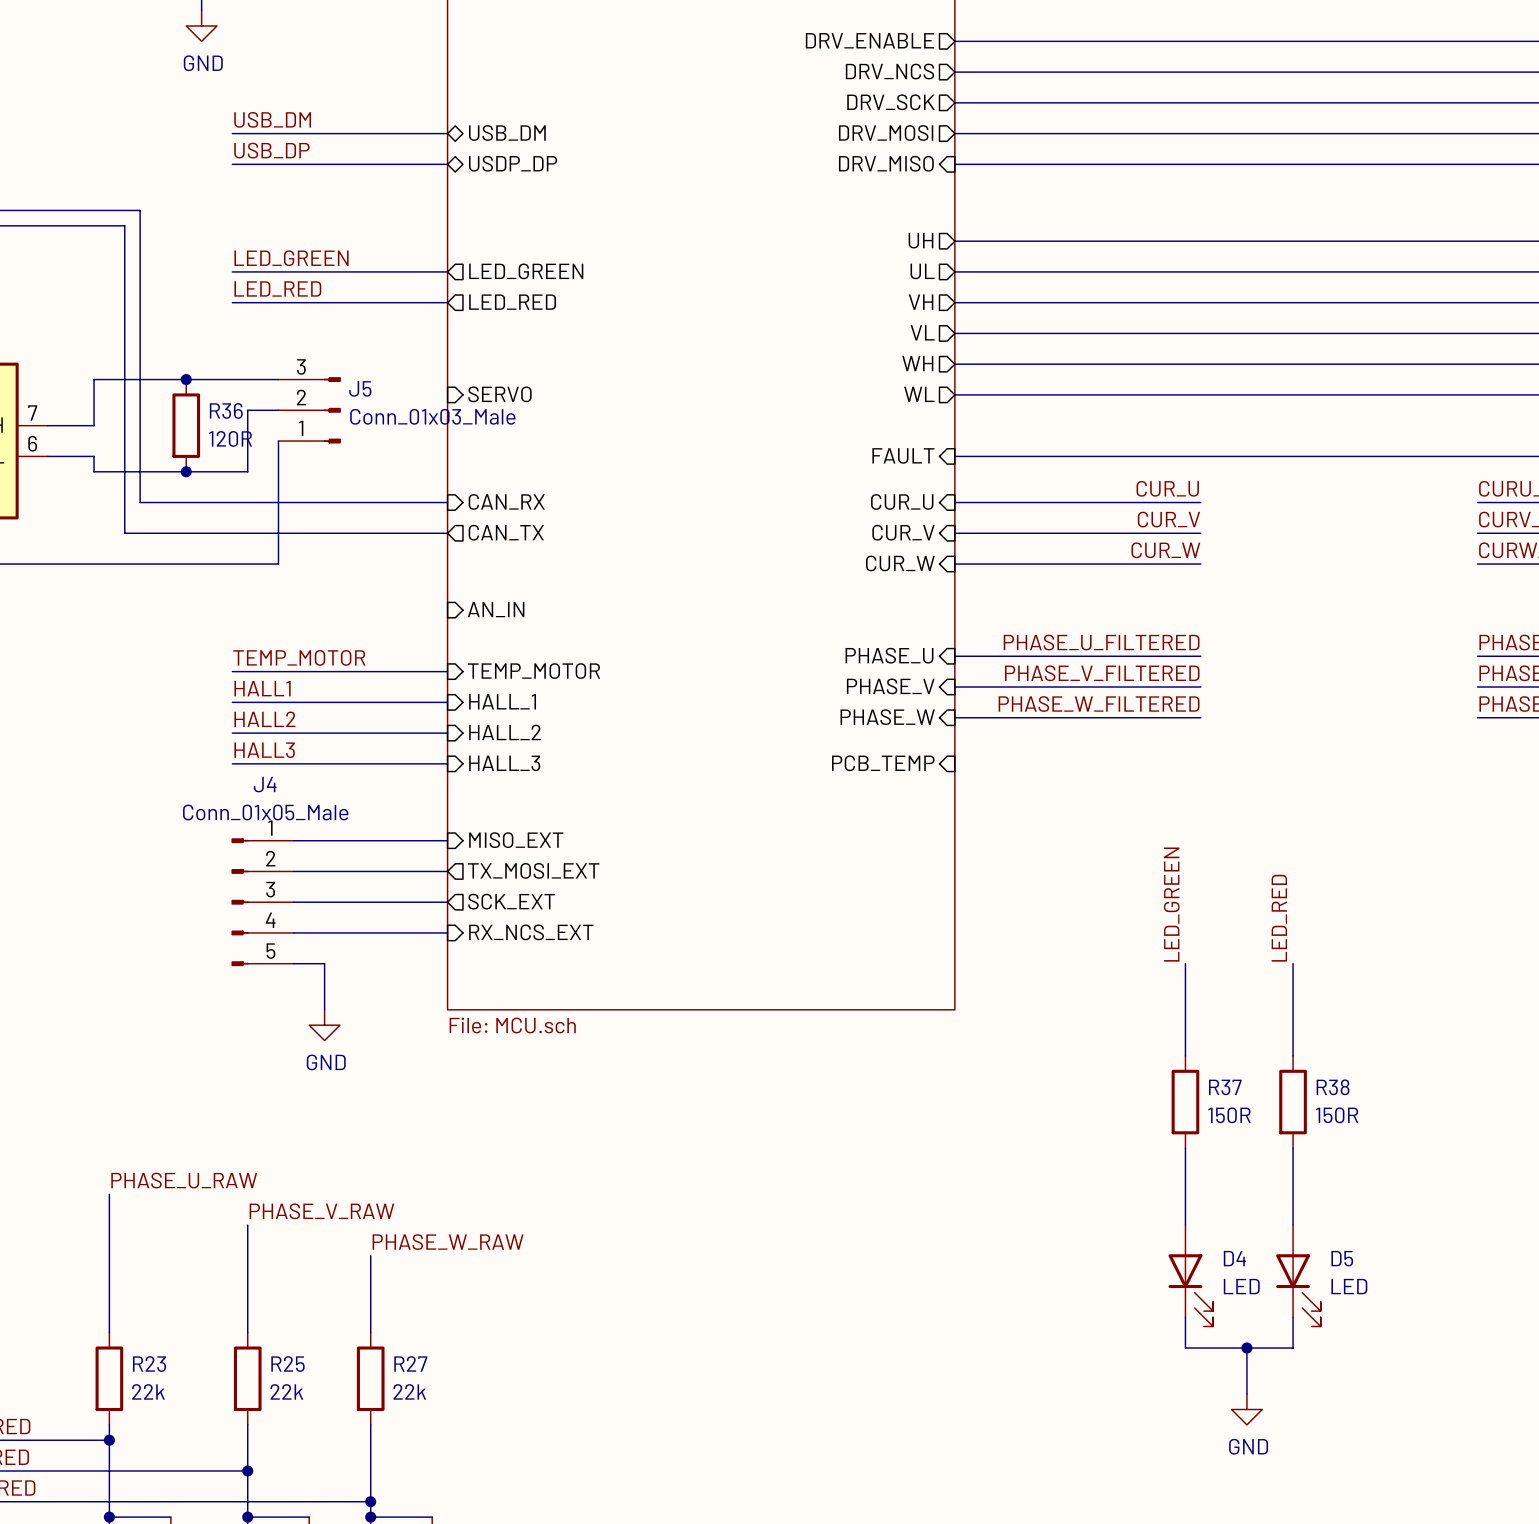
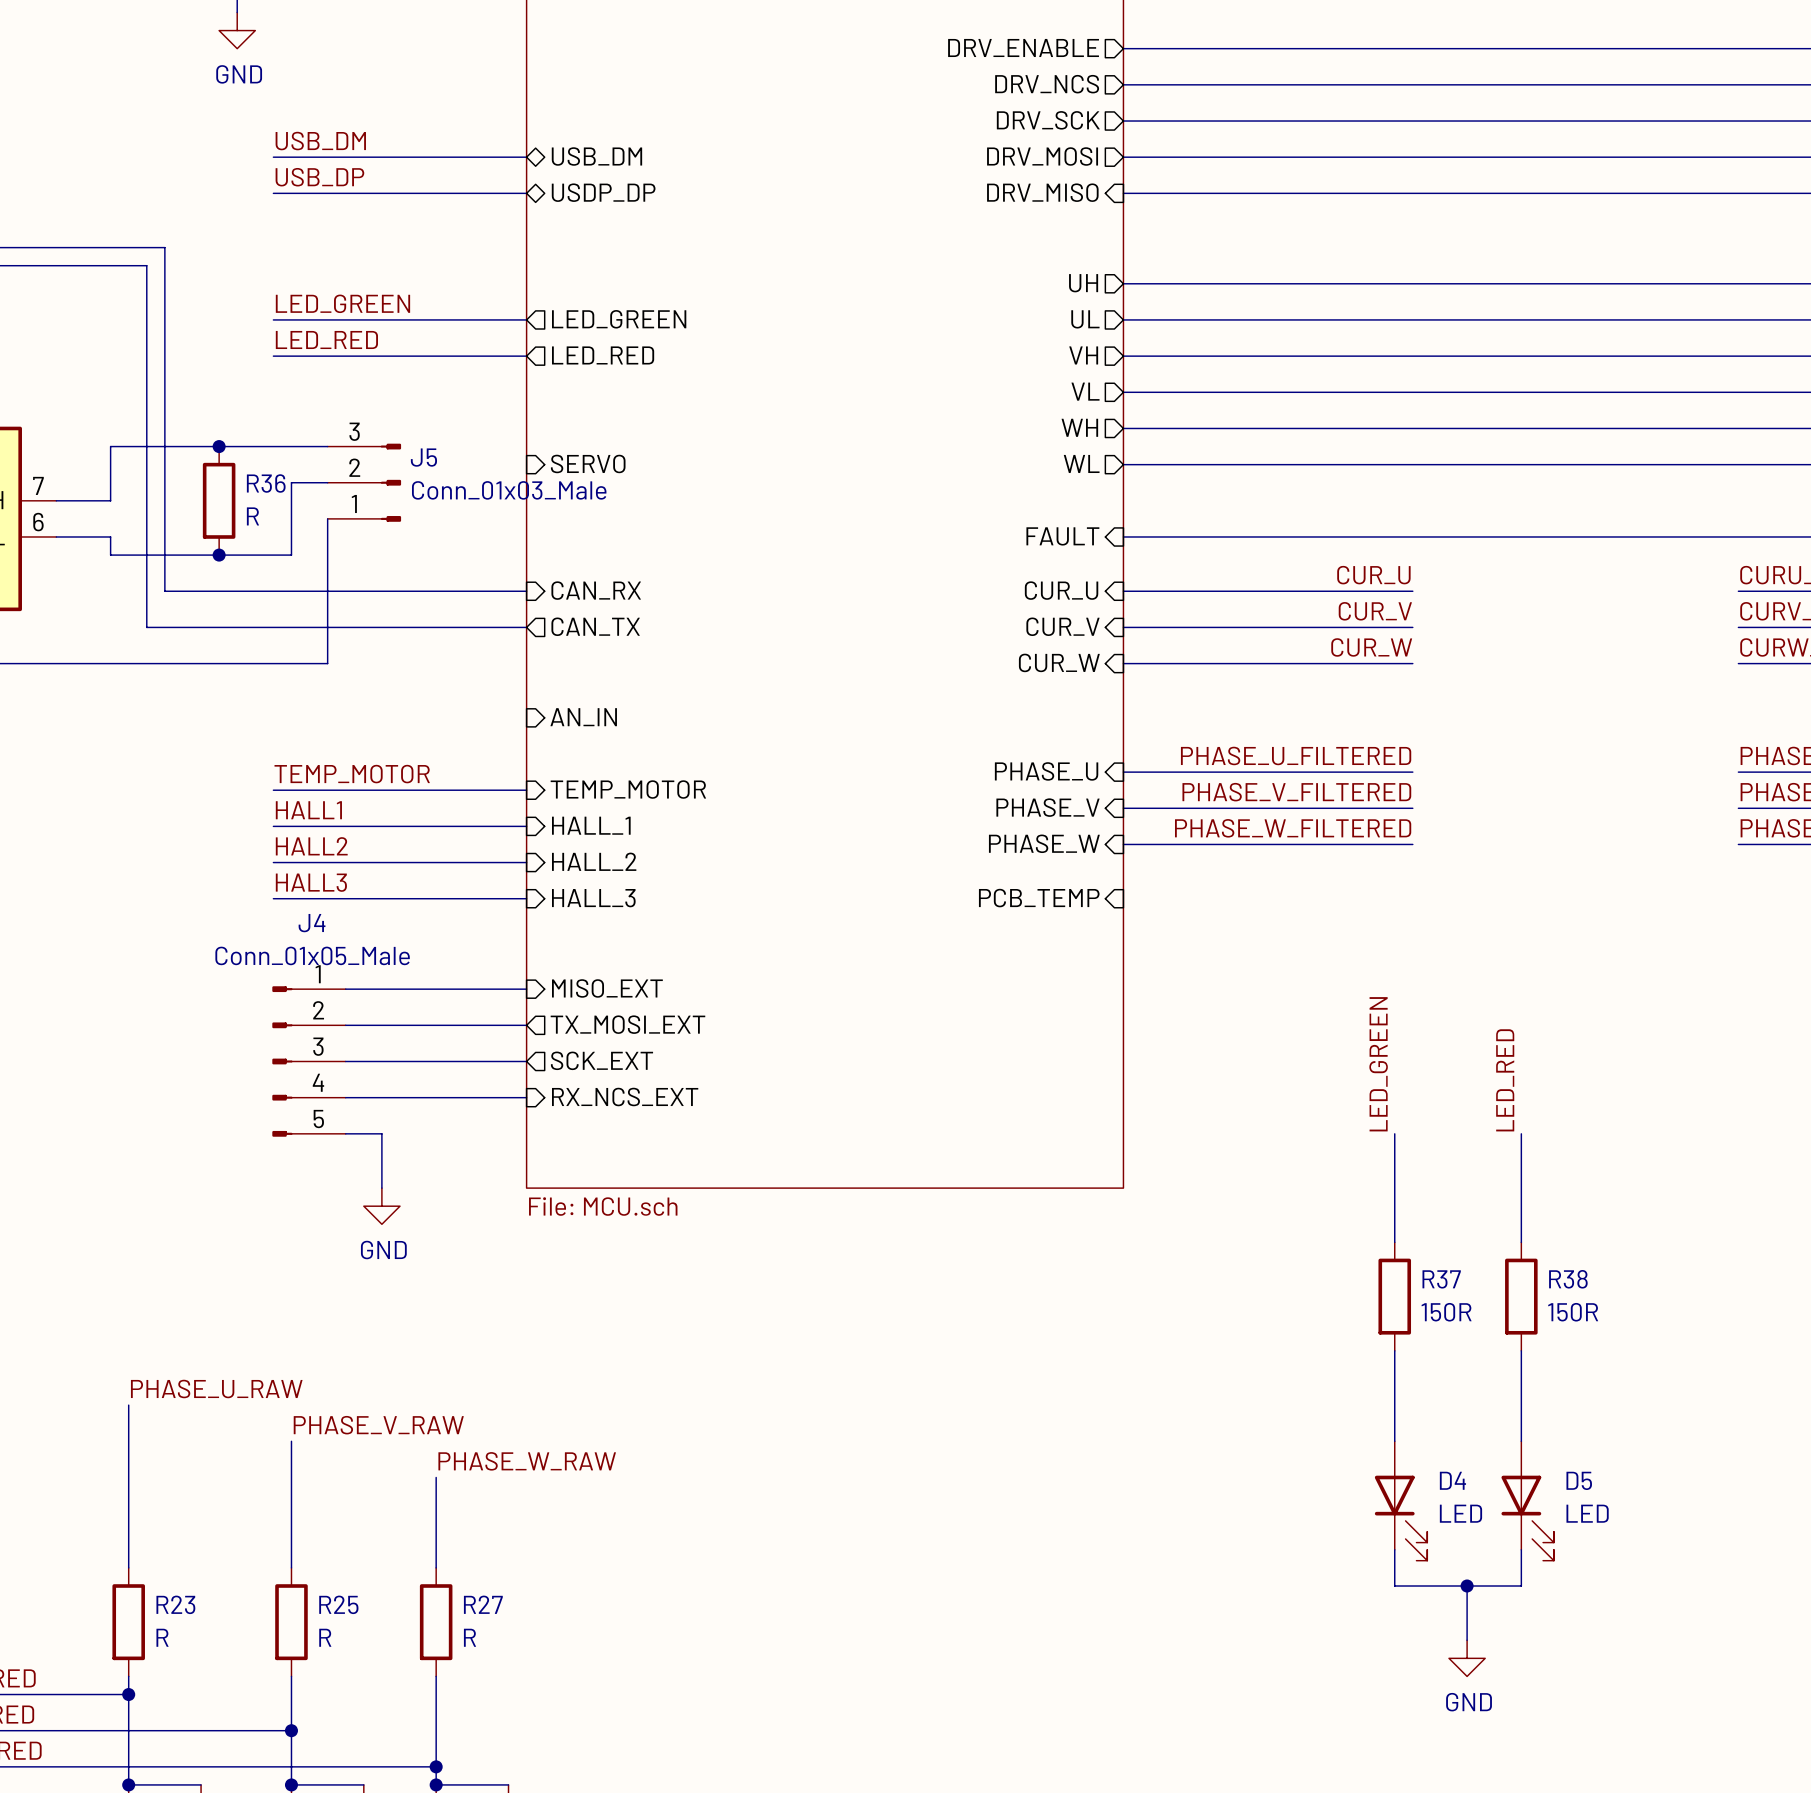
R36 value: 120R (230, 438) -> R (252, 516)
R23 value: 22k (148, 1391) -> R (162, 1637)
R25 value: 22k (286, 1391) -> R (325, 1637)
R27 value: 22k (409, 1391) -> R (469, 1637)

